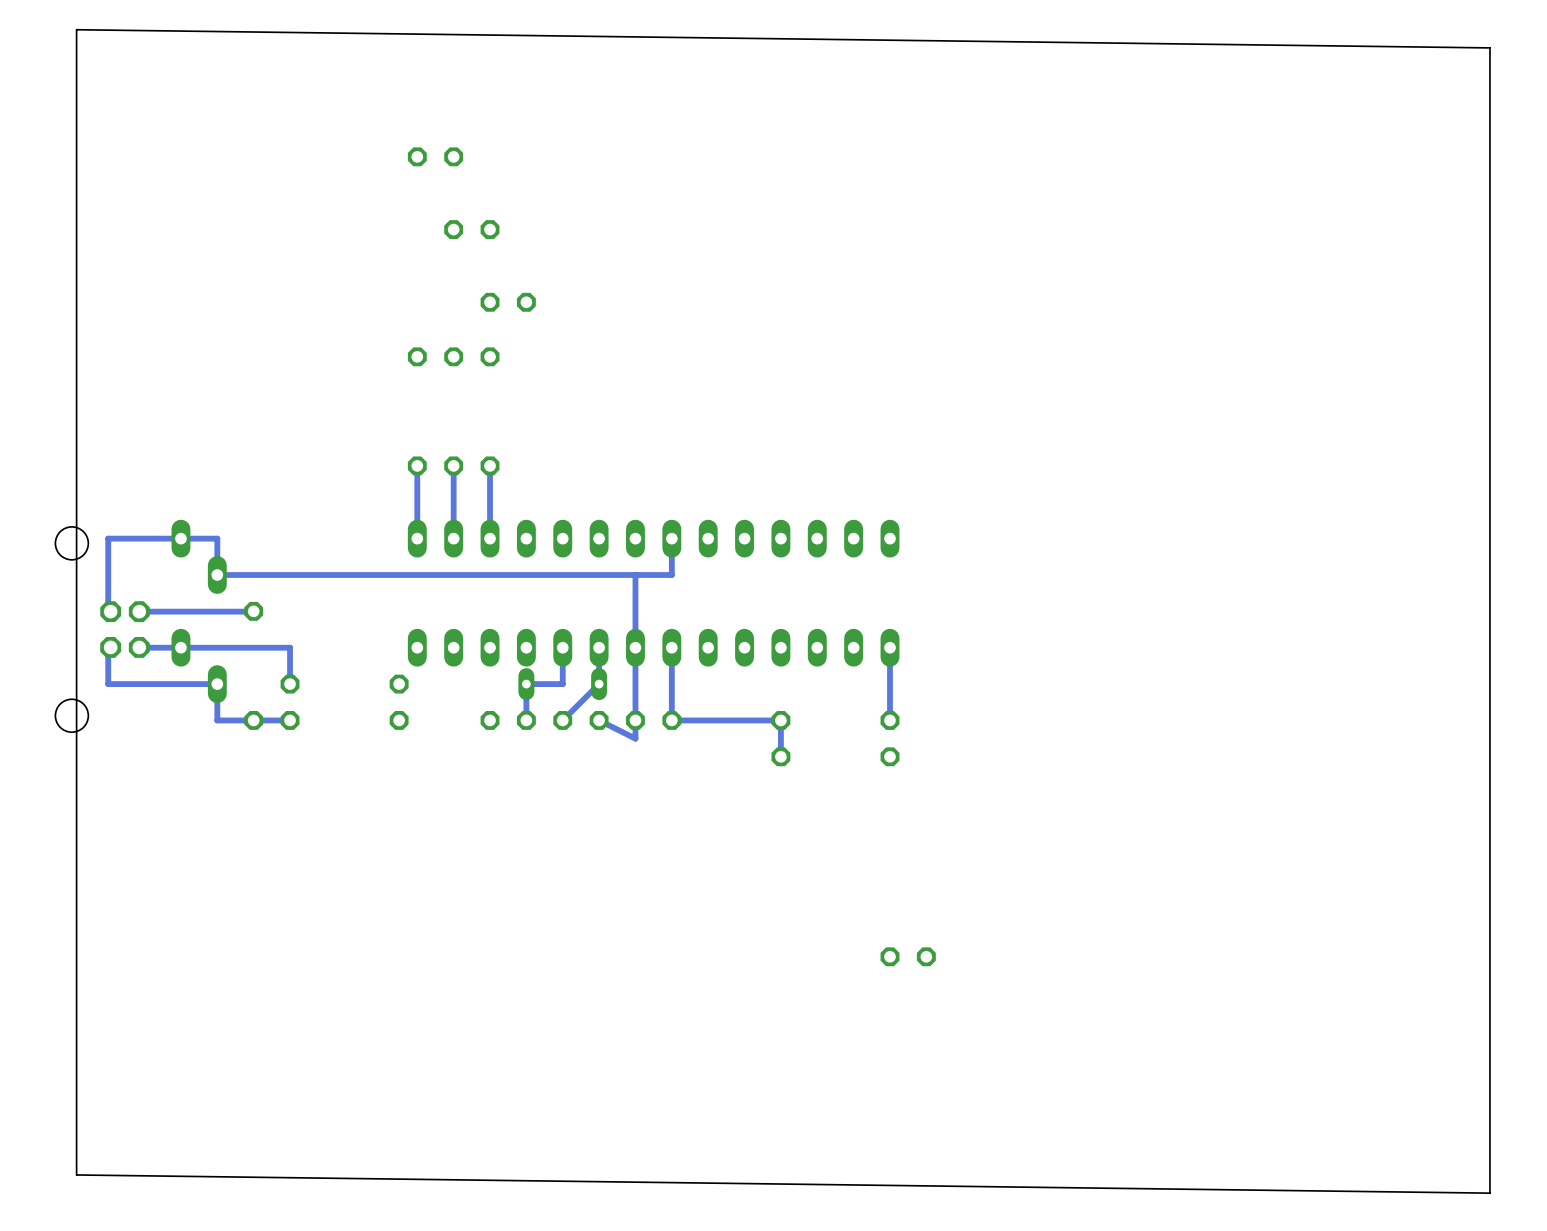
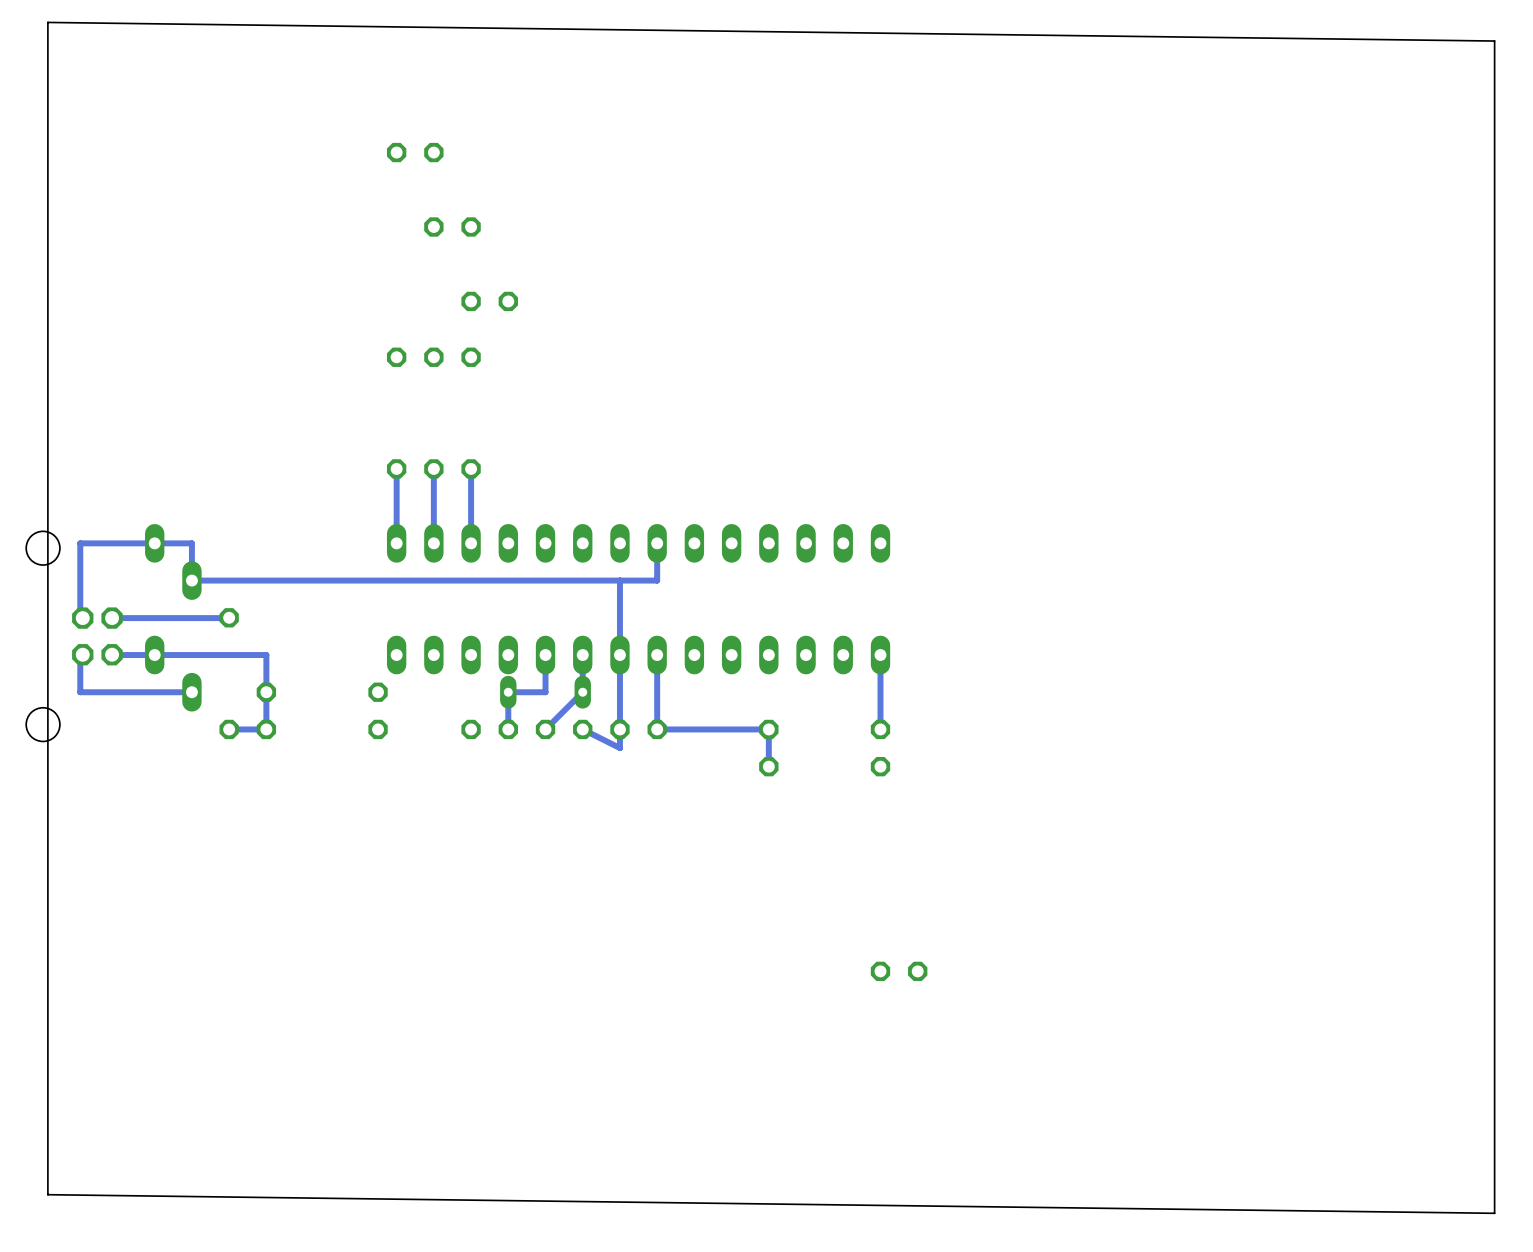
track: (217, 684) (217, 720) (253, 720) -> none
track: none -> (266, 692) (266, 729)

